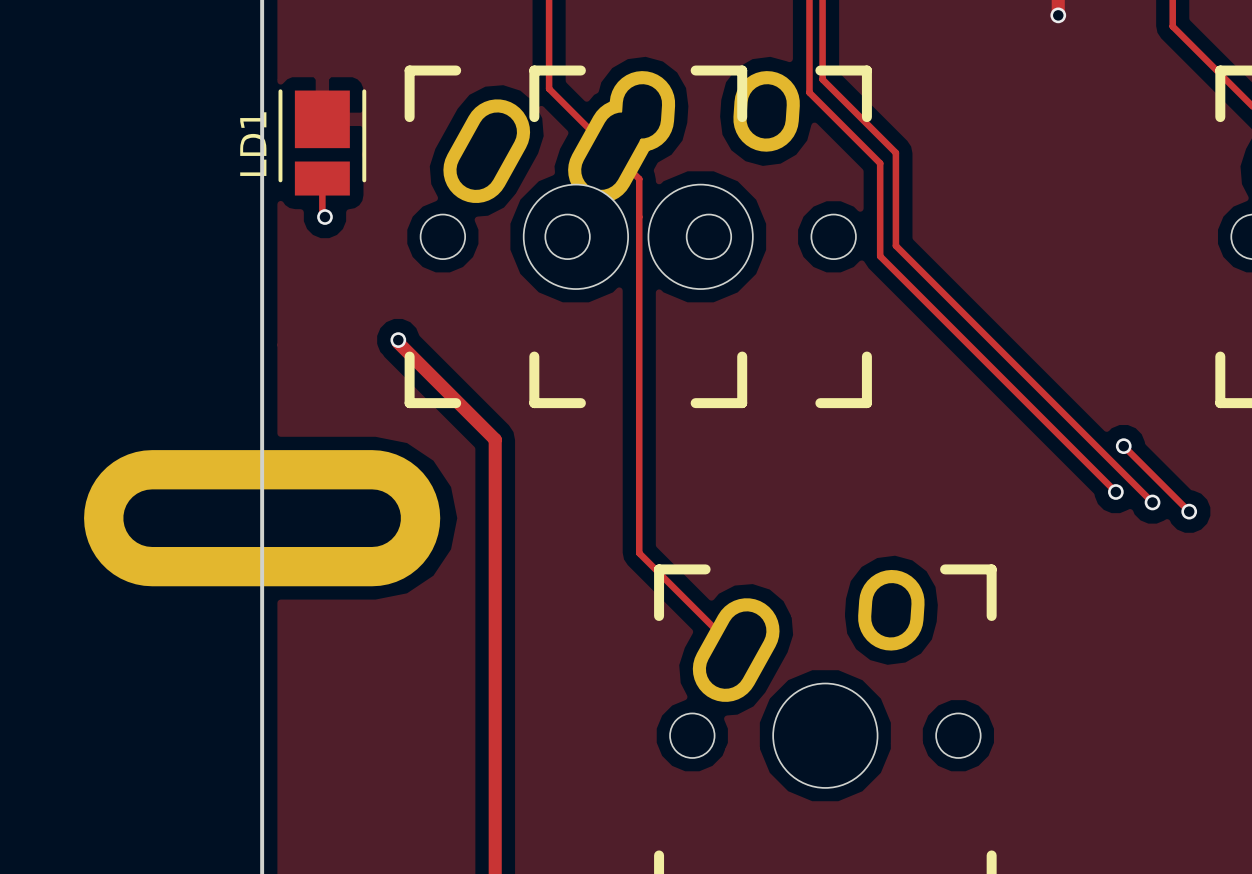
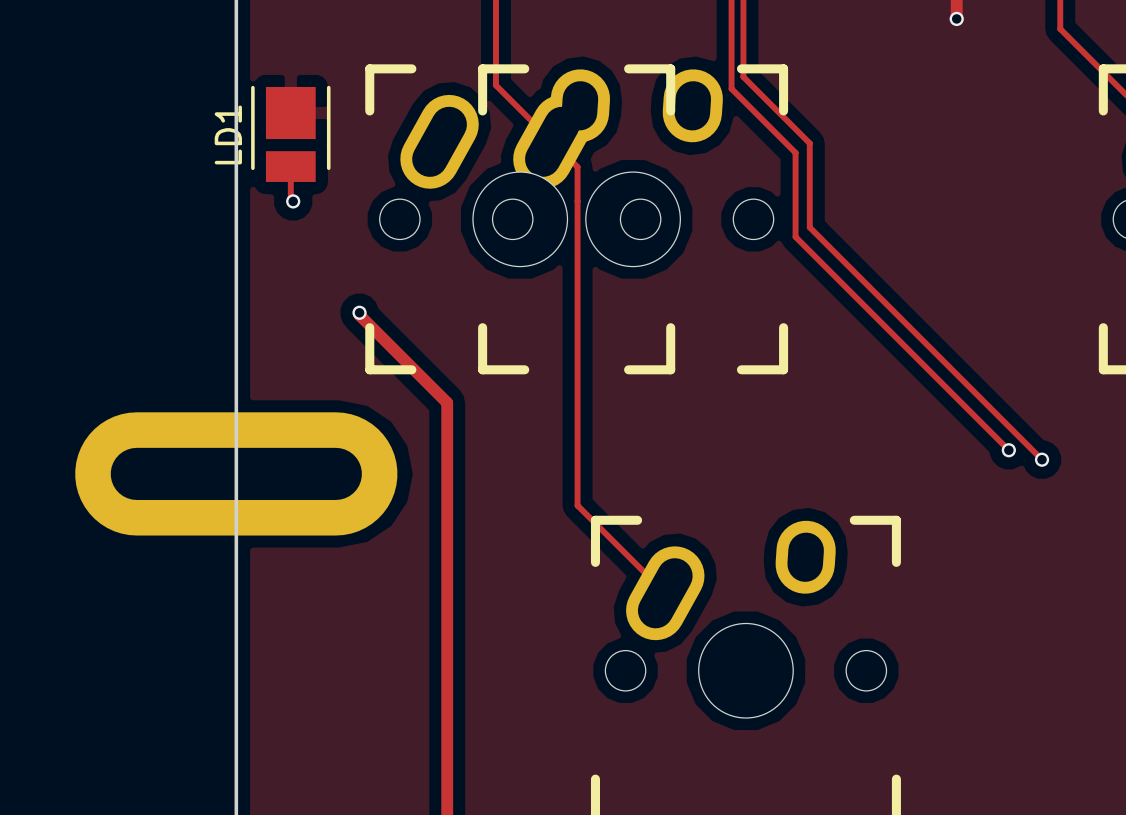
track: (1123, 446) (1189, 511) -> none
via: (1123, 446) -> none
via: (1189, 511) -> none

